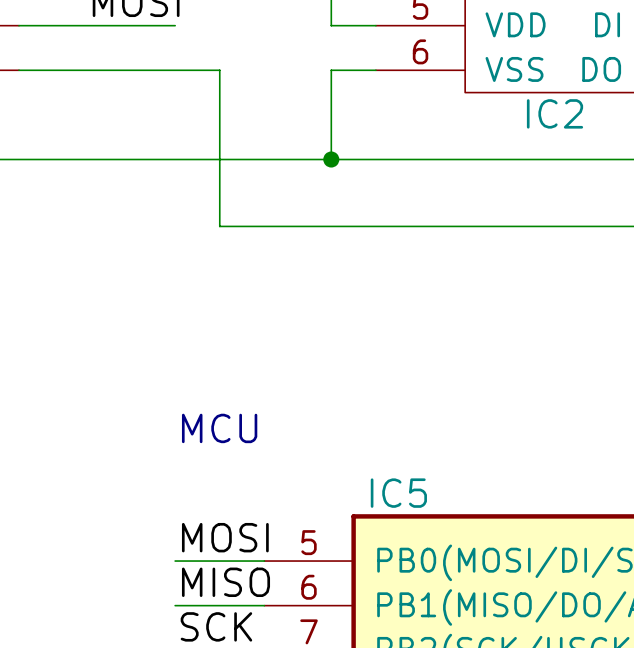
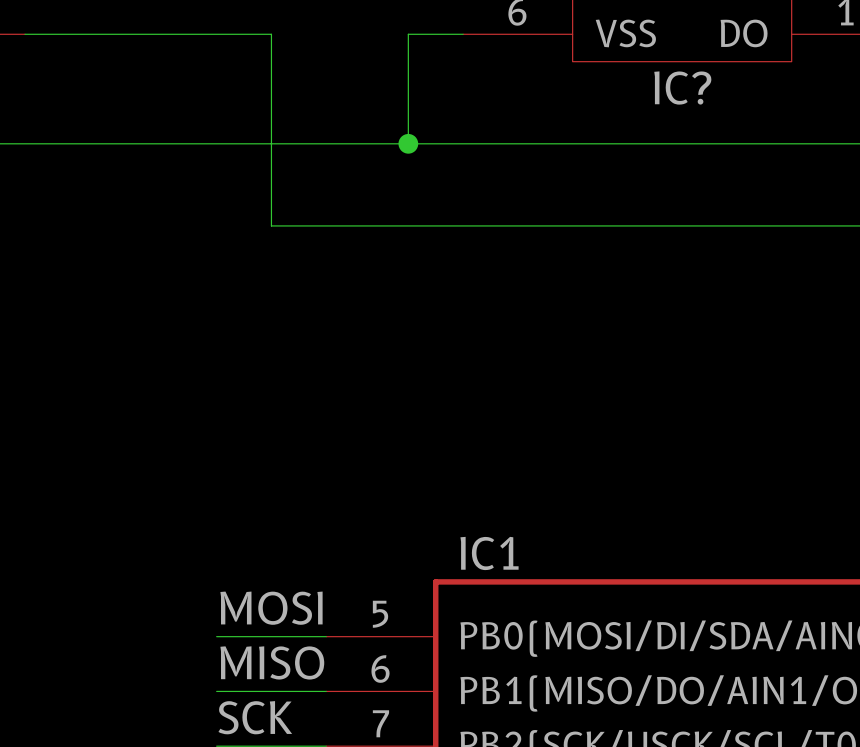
IC2 name: IC2 (555, 113) -> IC? (682, 88)
text: MCU (219, 428) -> none
IC5 name: IC5 (398, 493) -> IC1 (489, 553)

